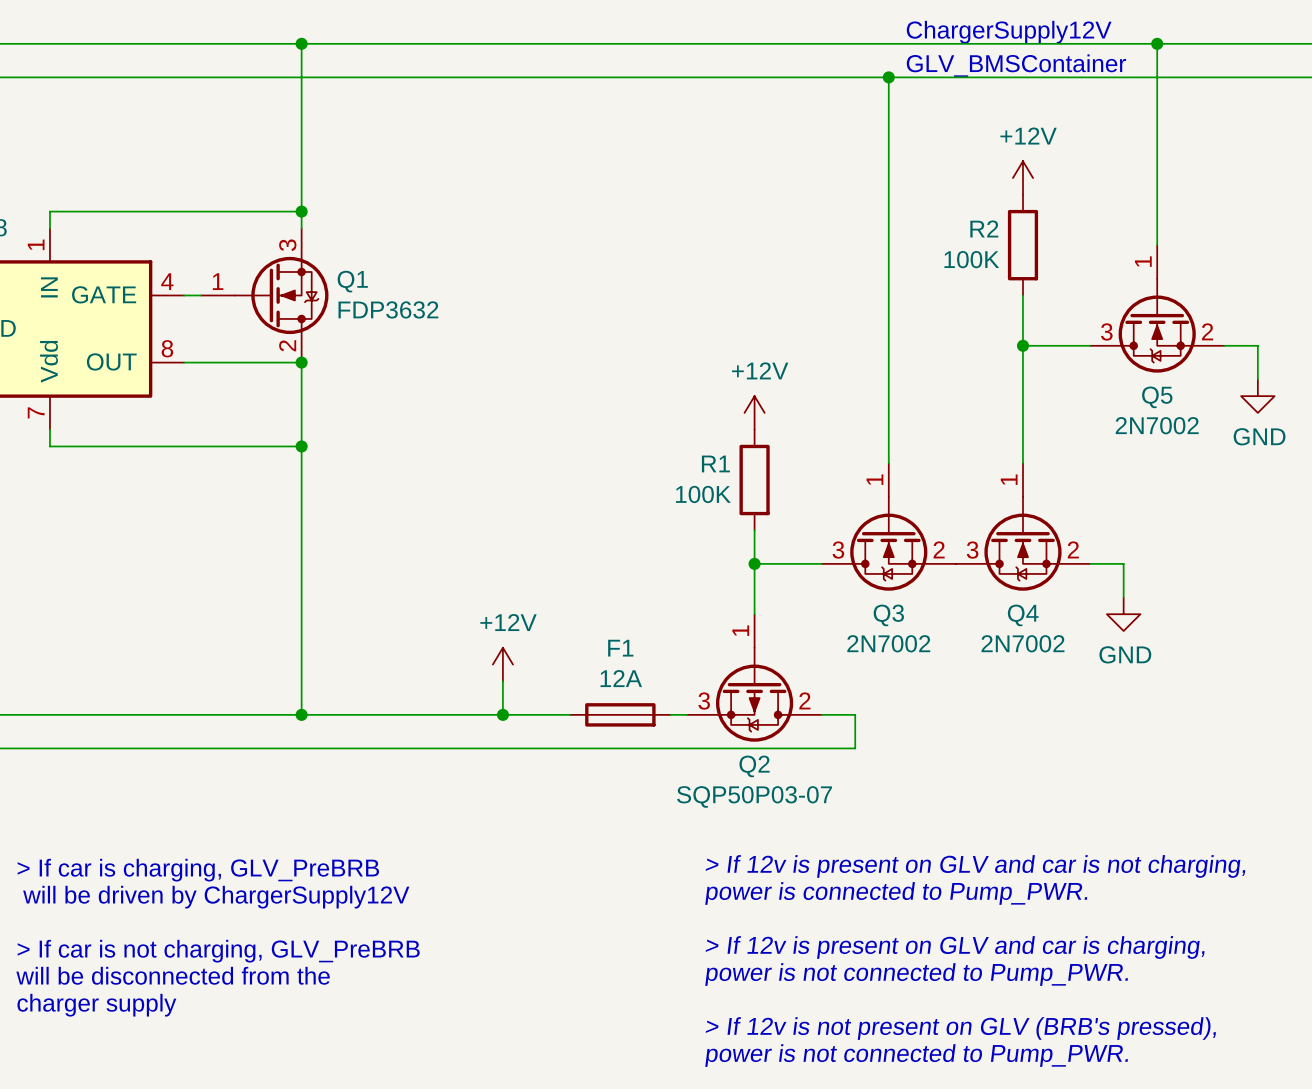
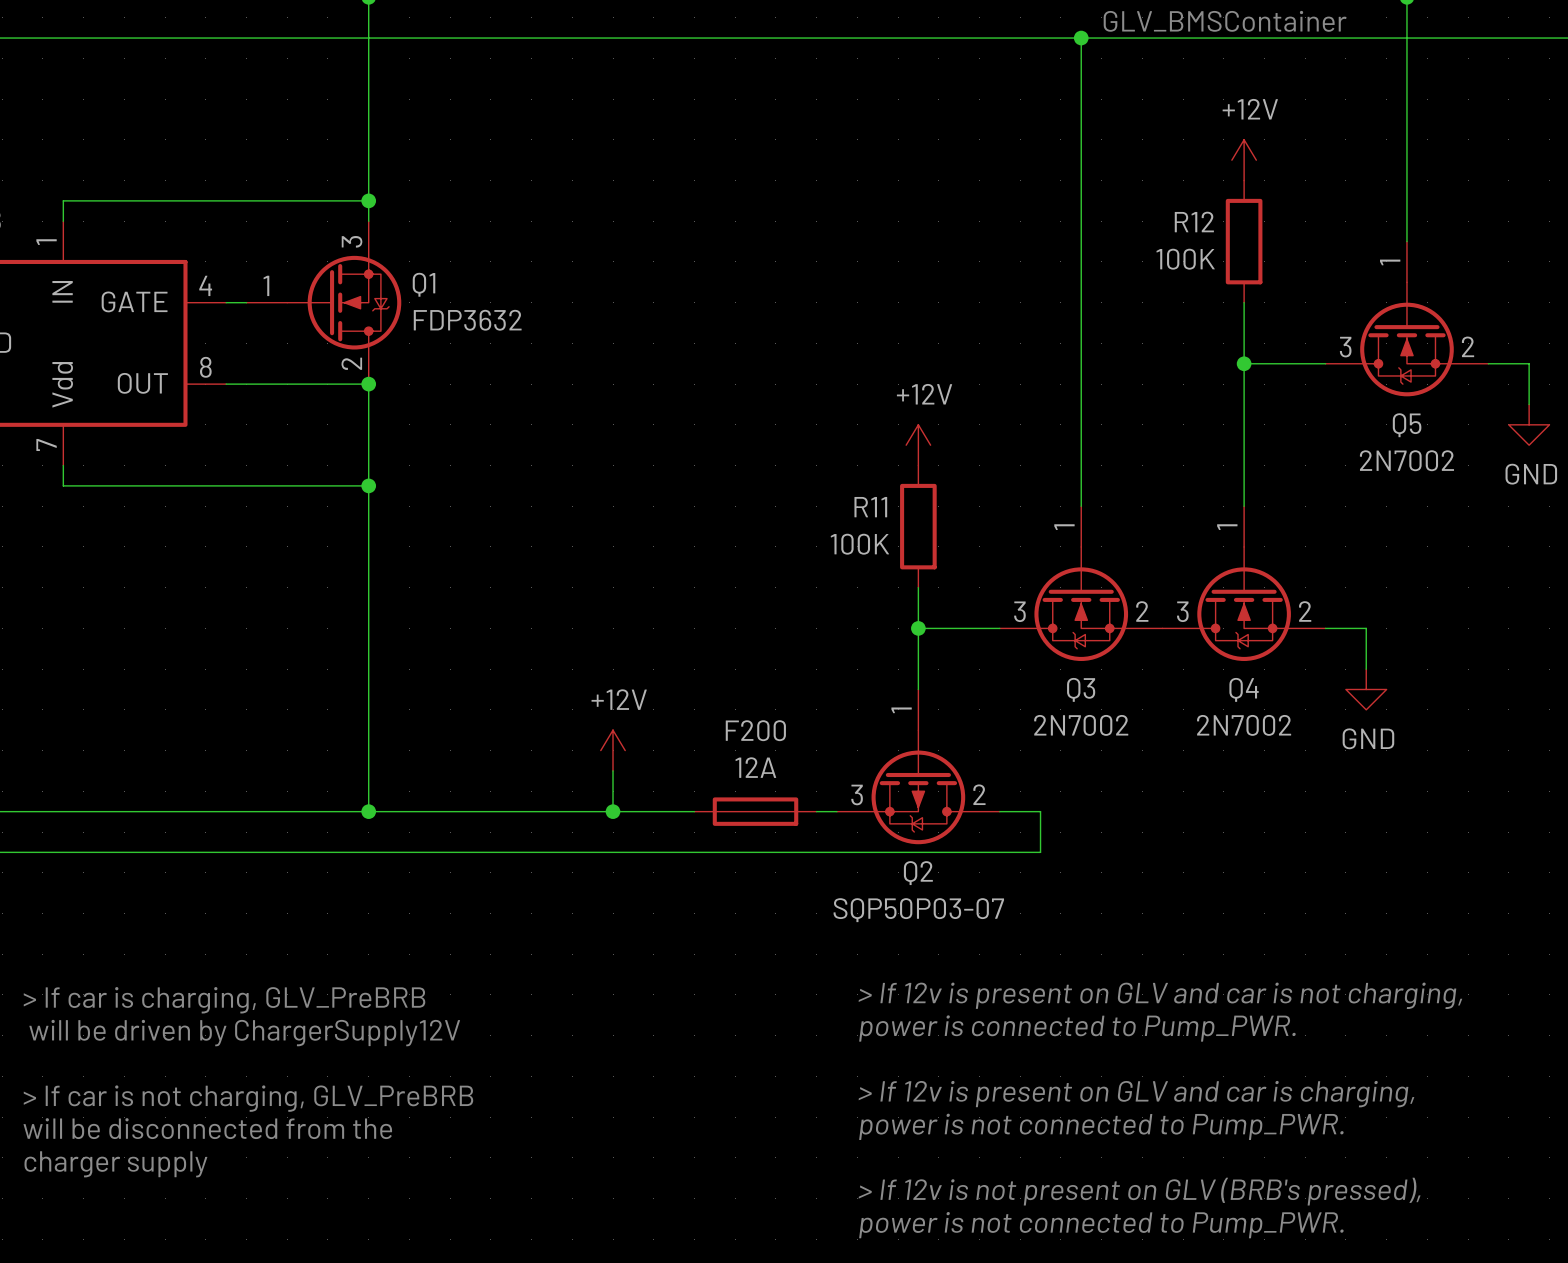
R2 name: R2 (984, 228) -> R12 (1194, 222)
R1 name: R1 (715, 463) -> R11 (870, 507)
F1 name: F1 (620, 648) -> F200 (755, 730)

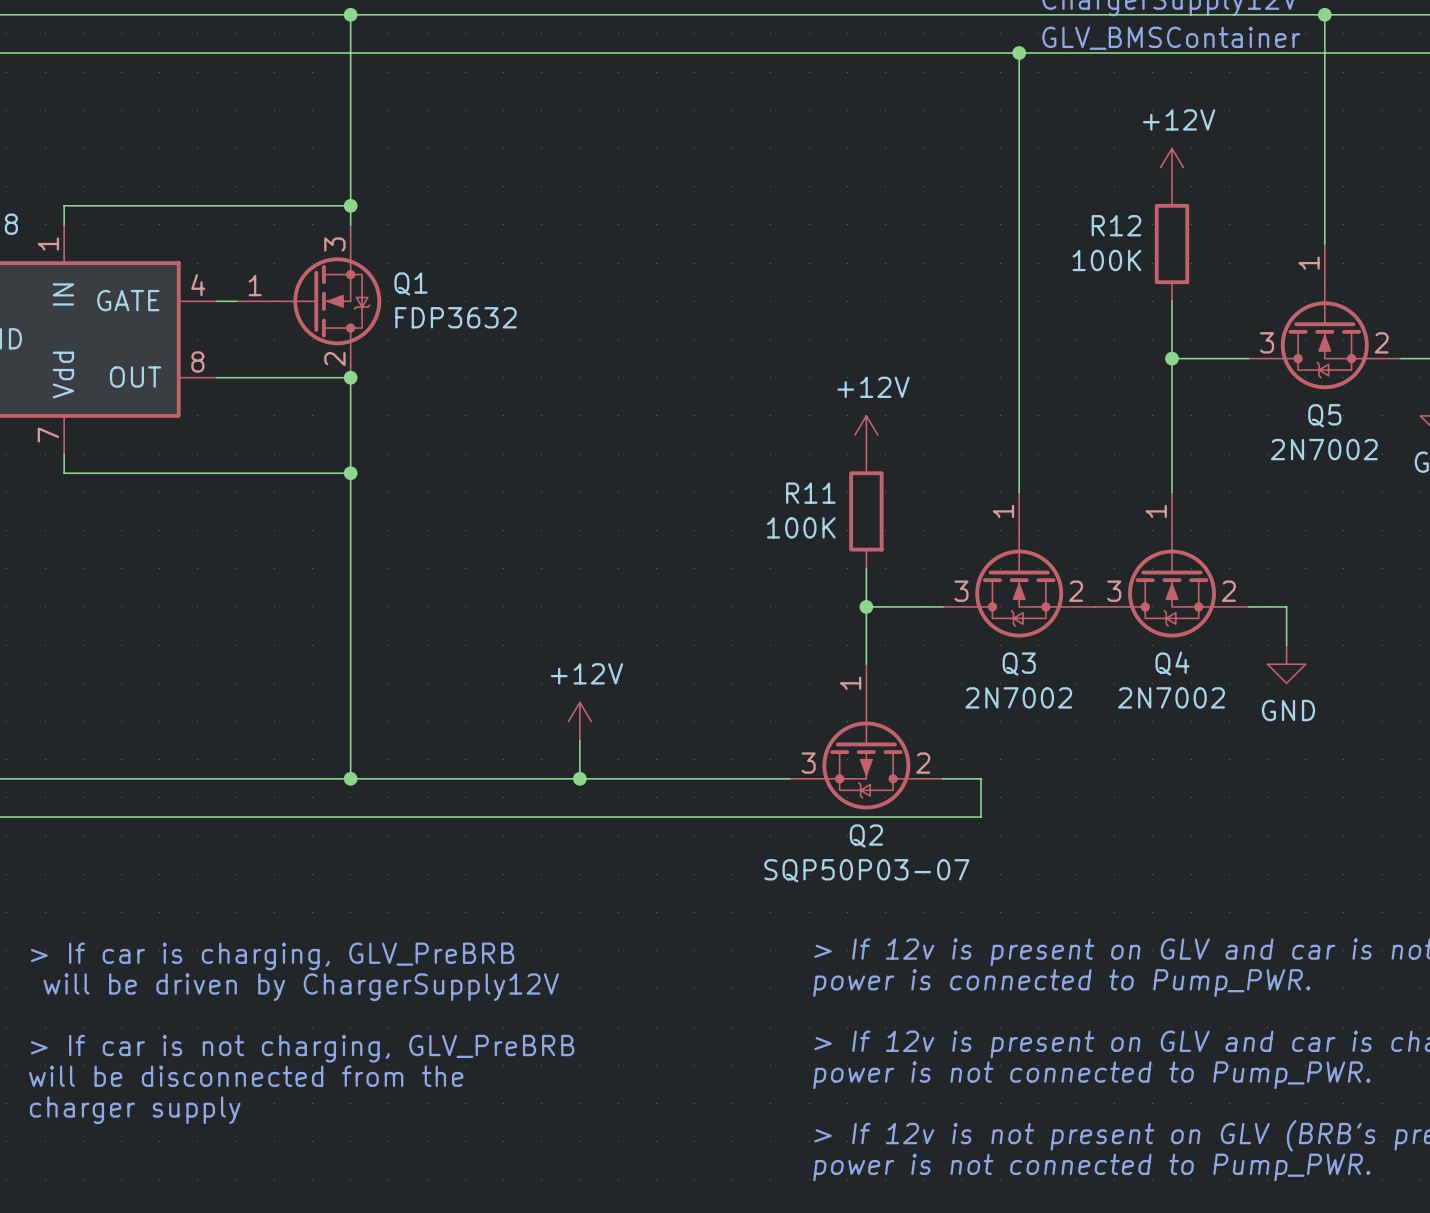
F200: 12A (755, 811) -> none

